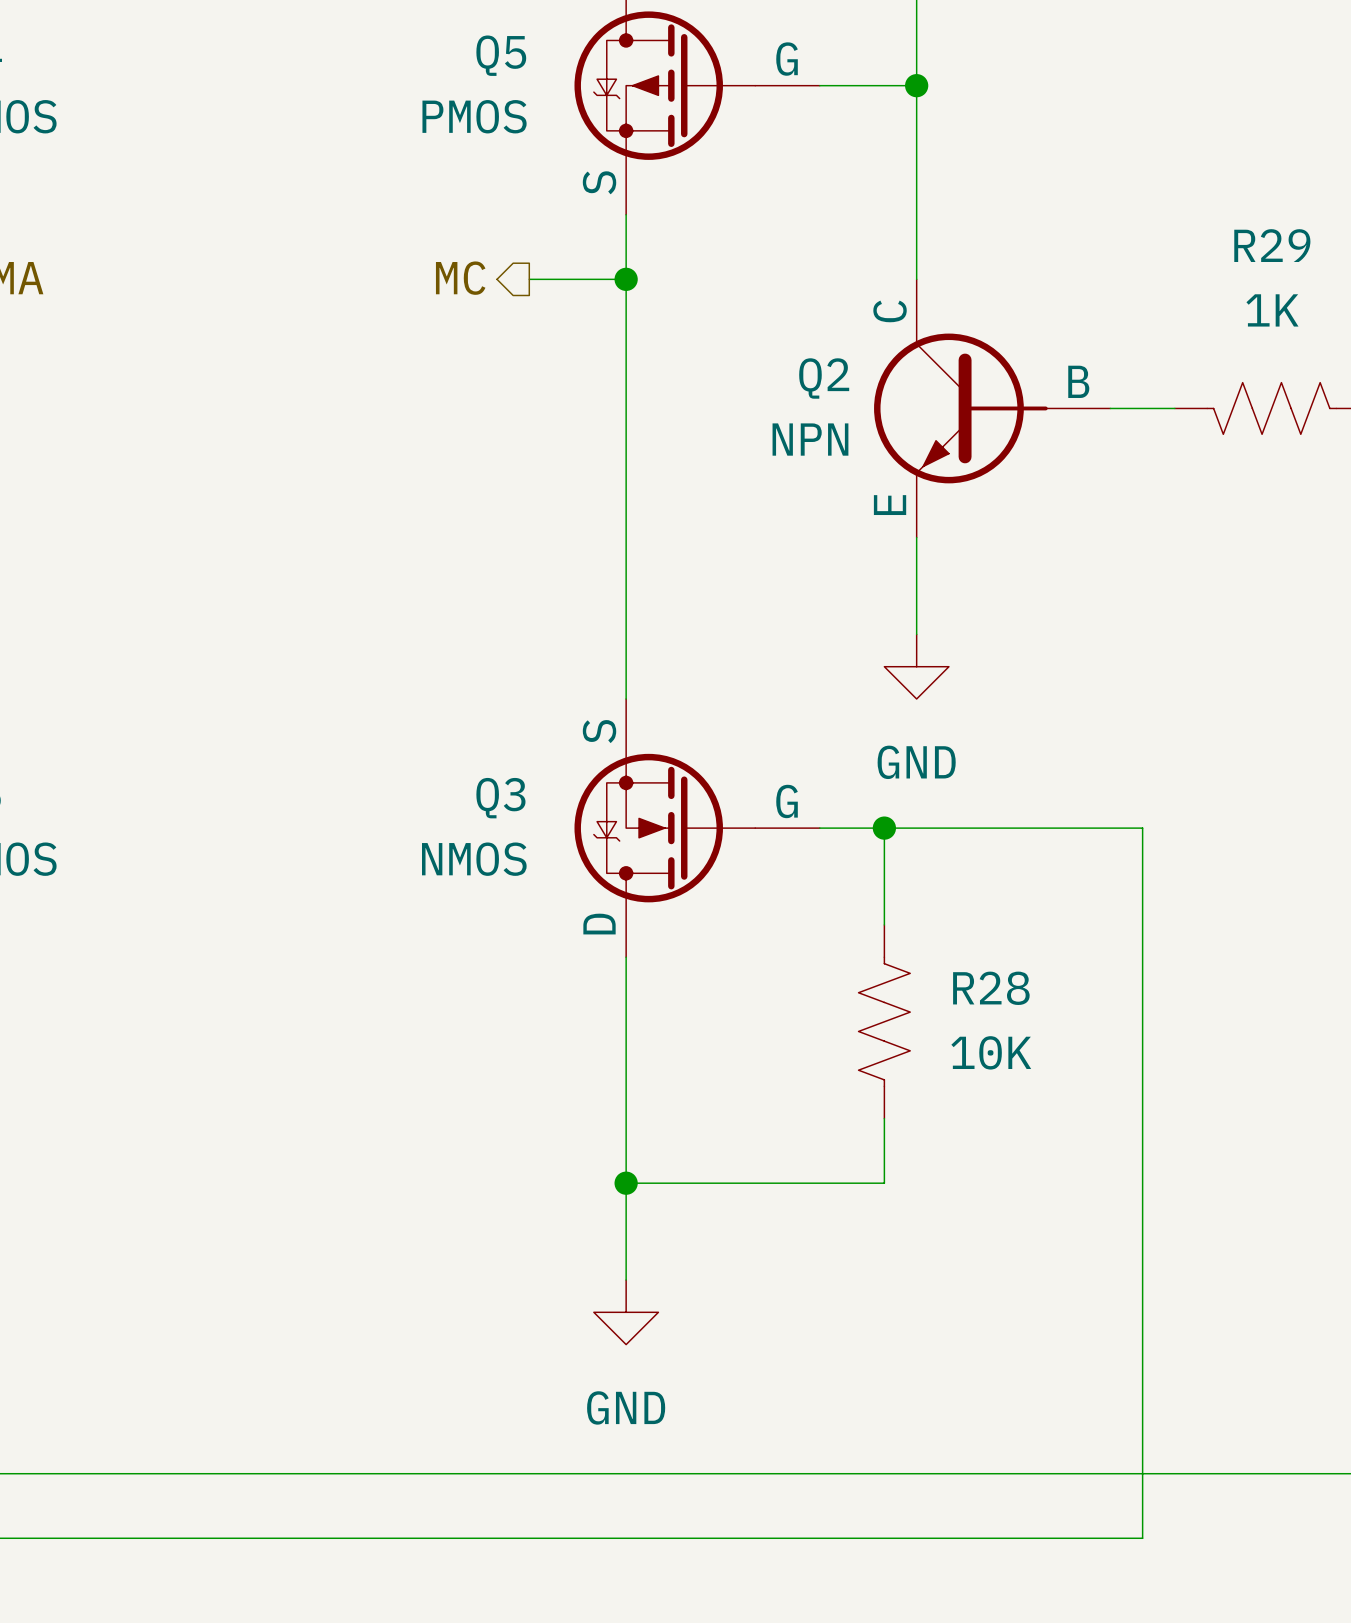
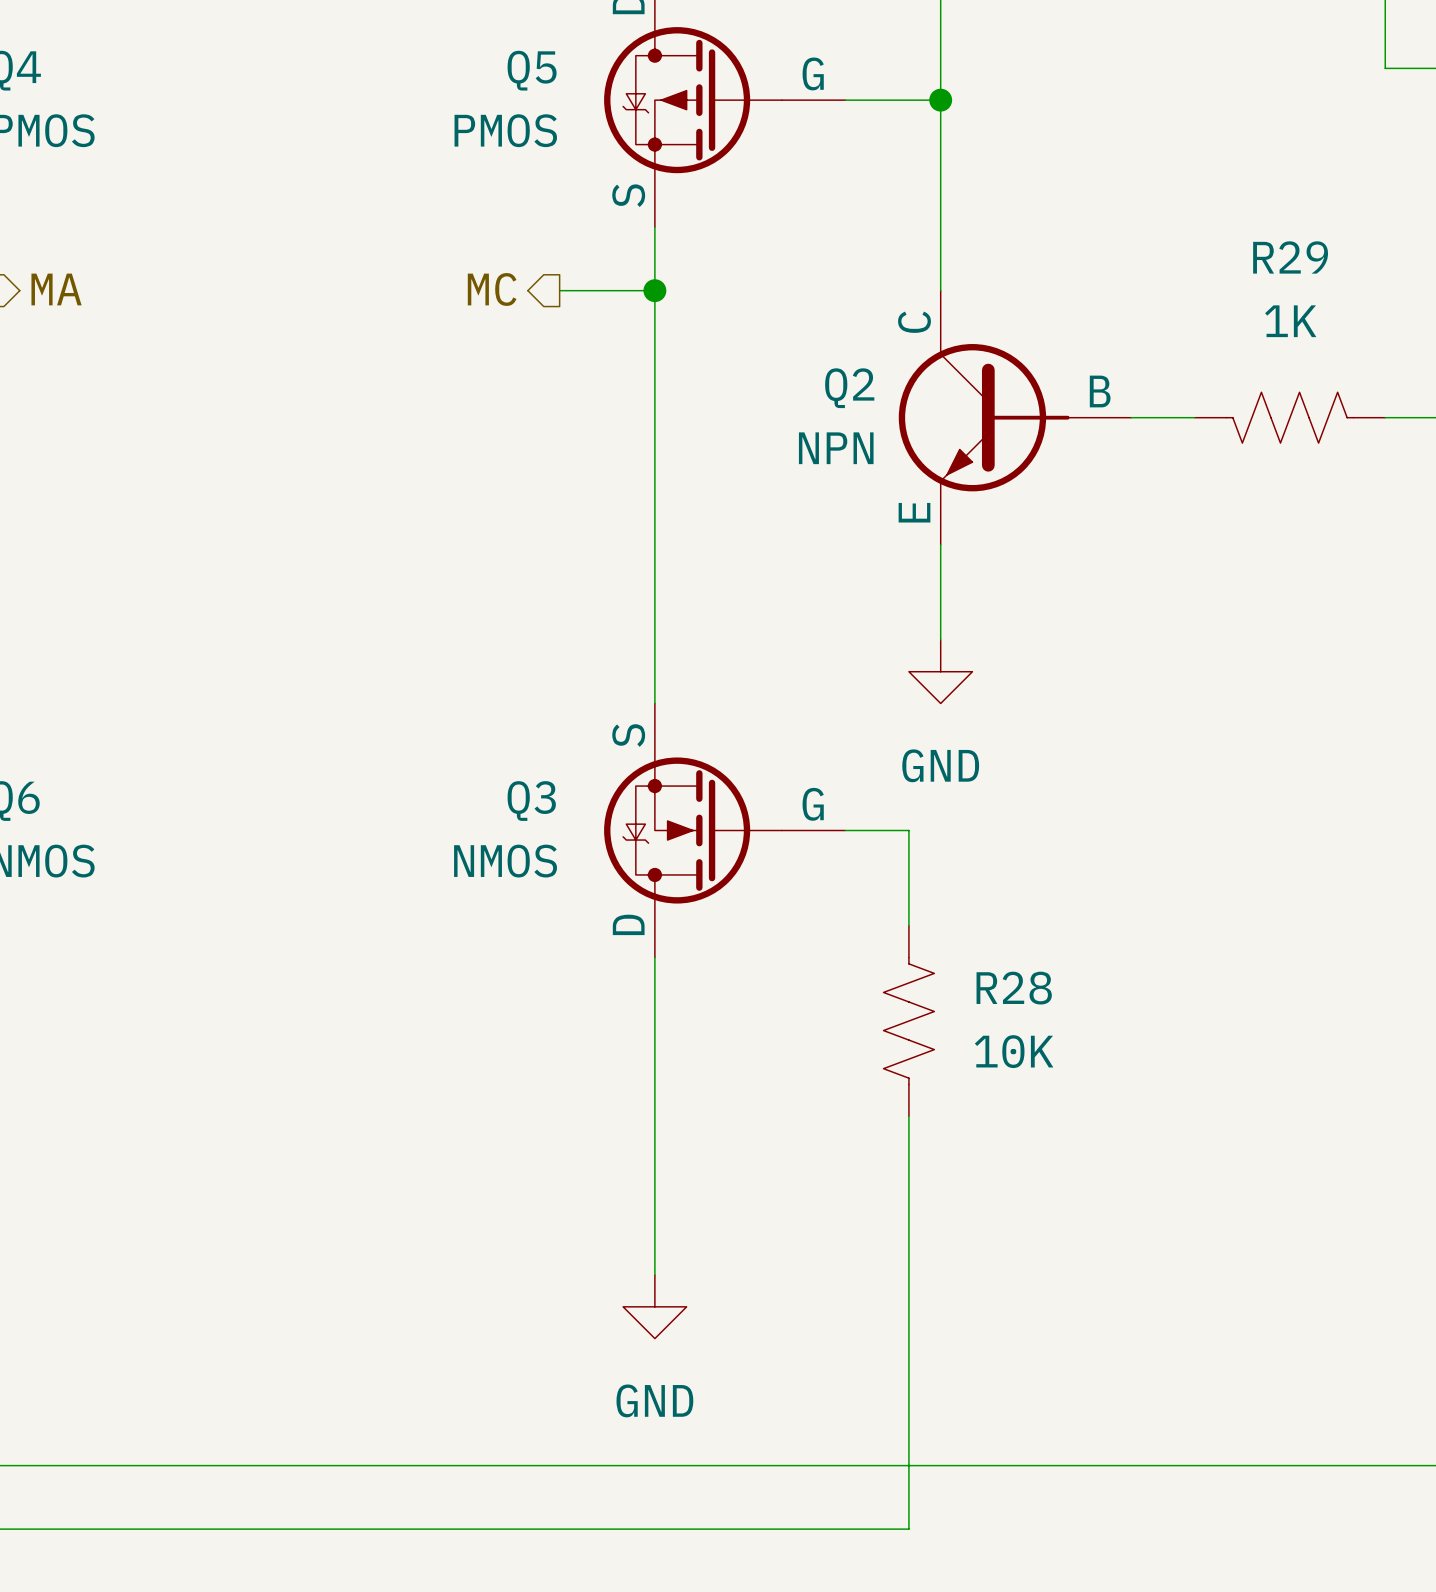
wire: (884, 828) (1142, 828) (1142, 1538) (884, 1538) -> (908, 1179) (908, 1529)
junction: (884, 828) -> none
wire: (626, 1183) (884, 1183) -> none
junction: (626, 1183) -> none

